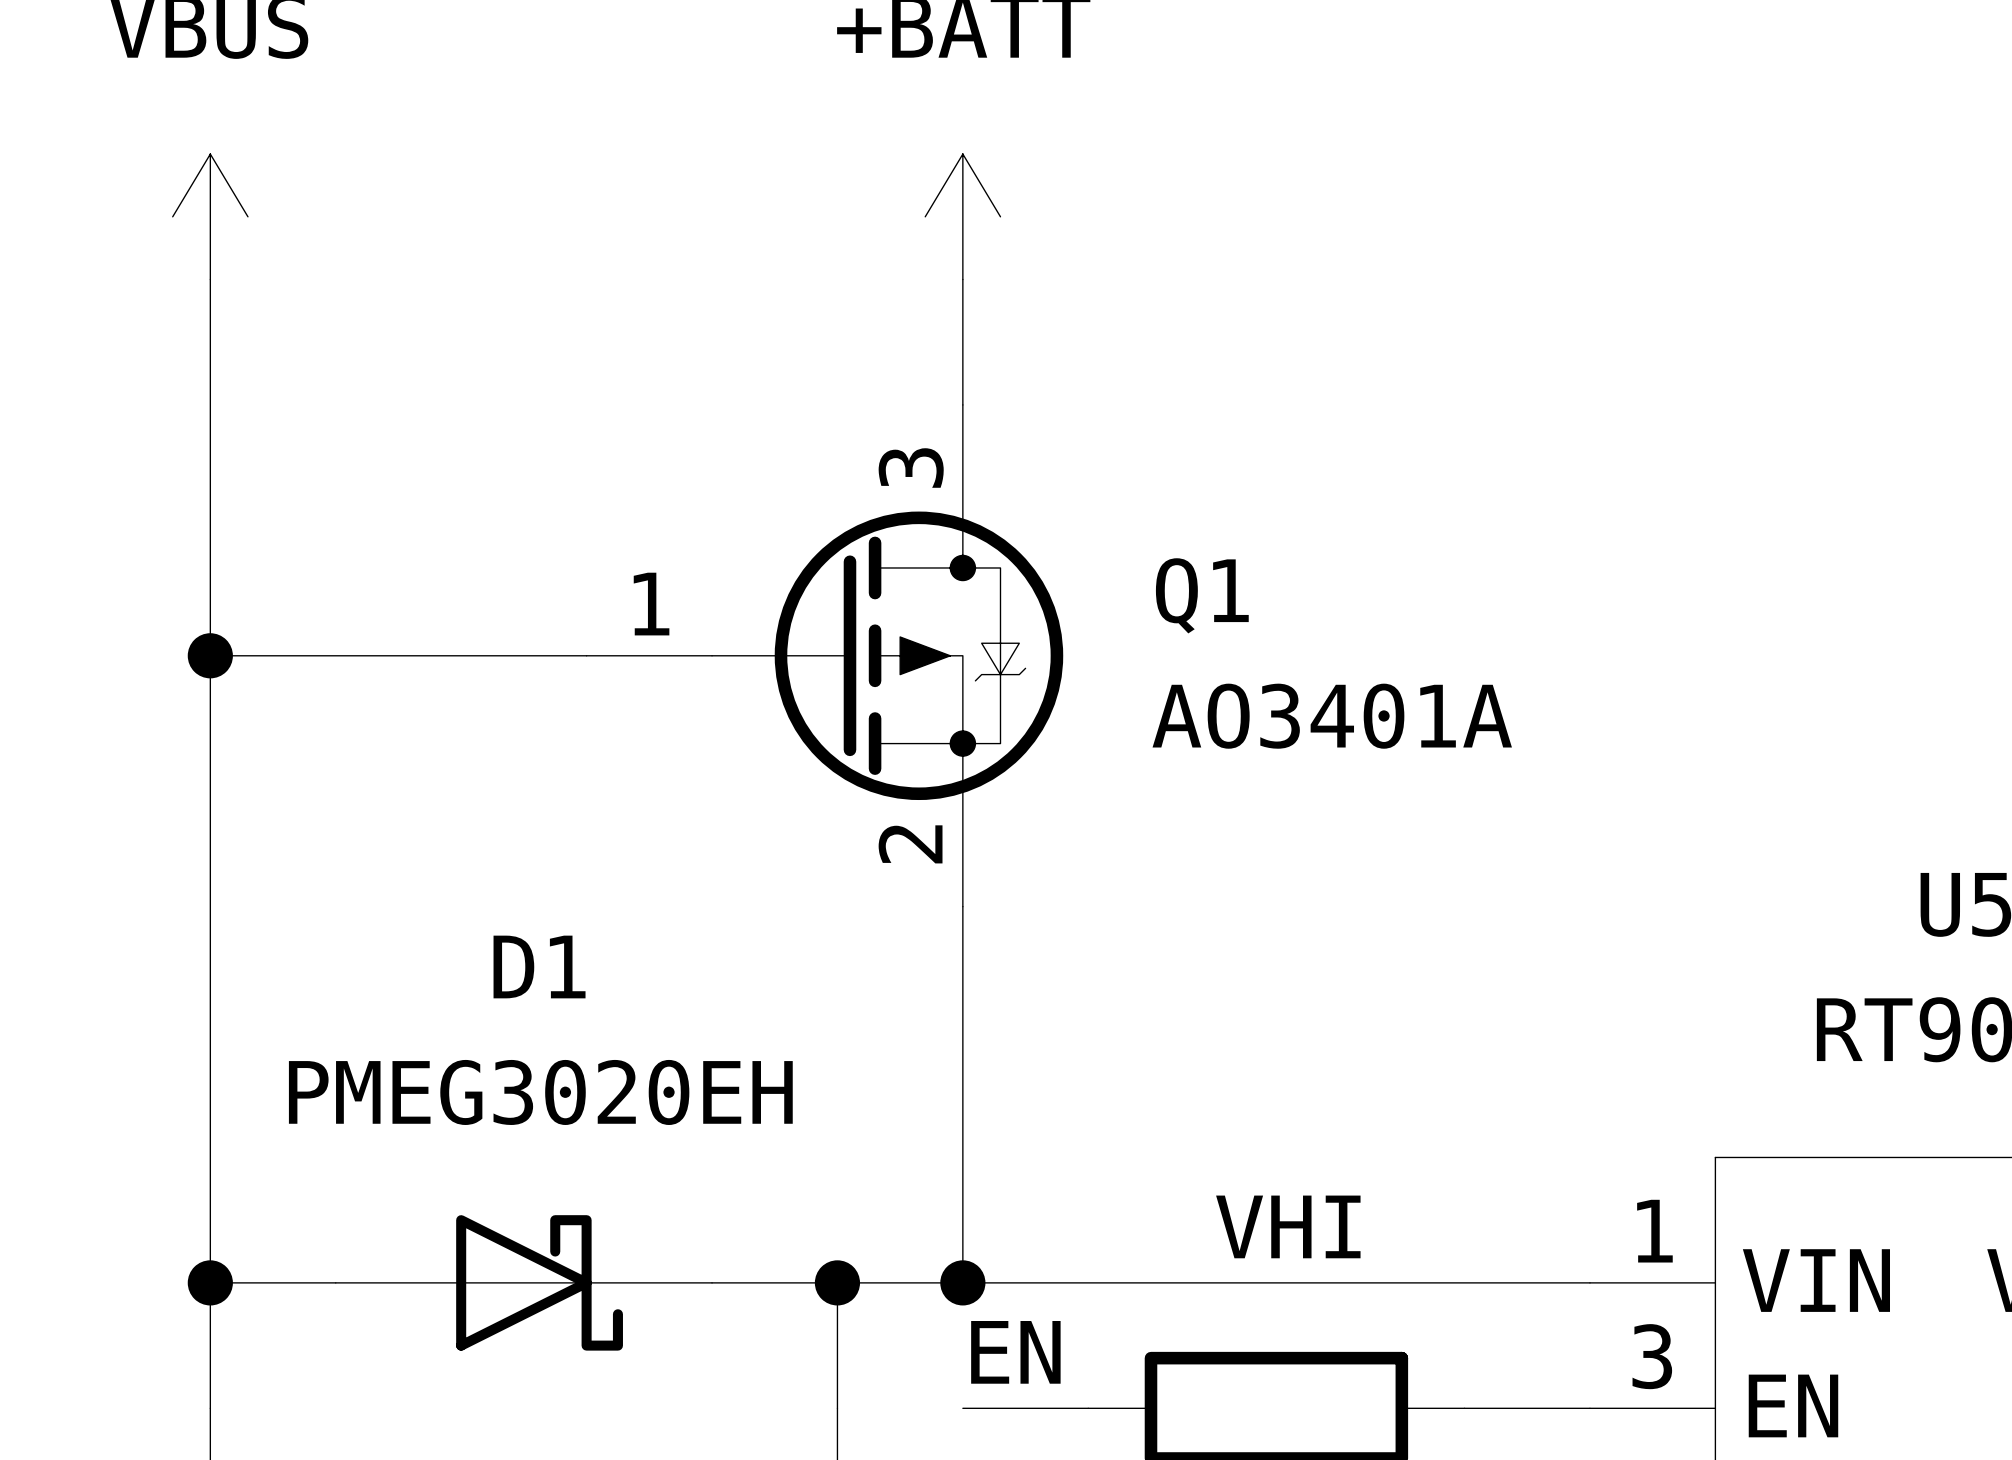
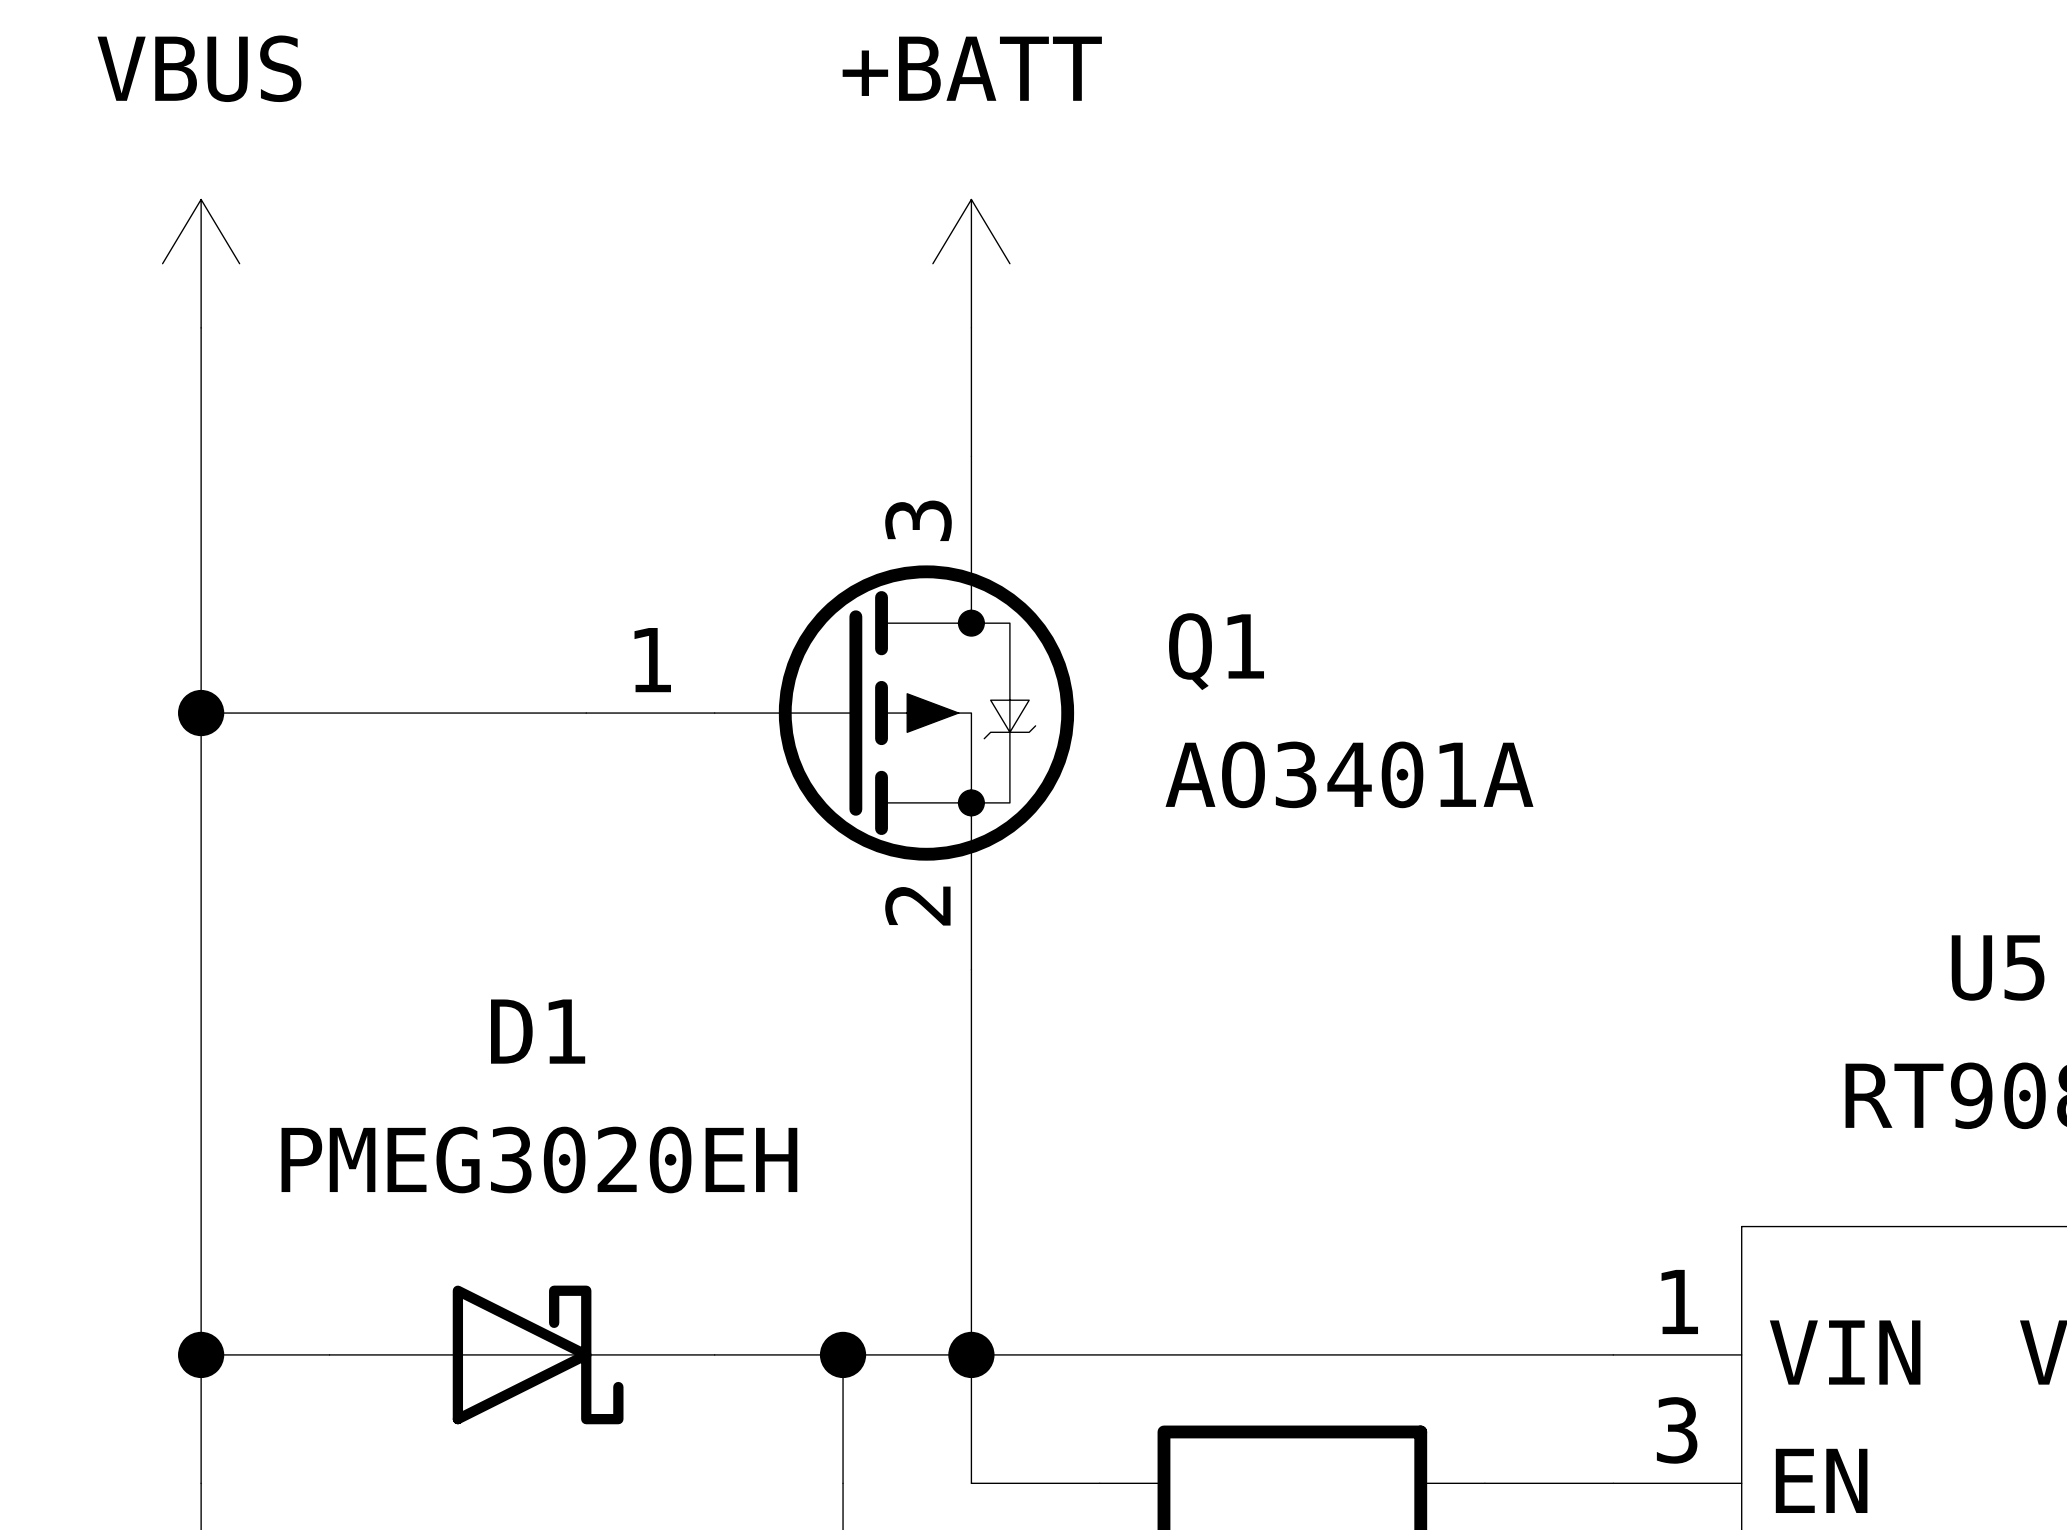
label: VHI (1288, 1226) -> none
wire: none -> (971, 1354) (971, 1483)
label: EN (1015, 1352) -> none

